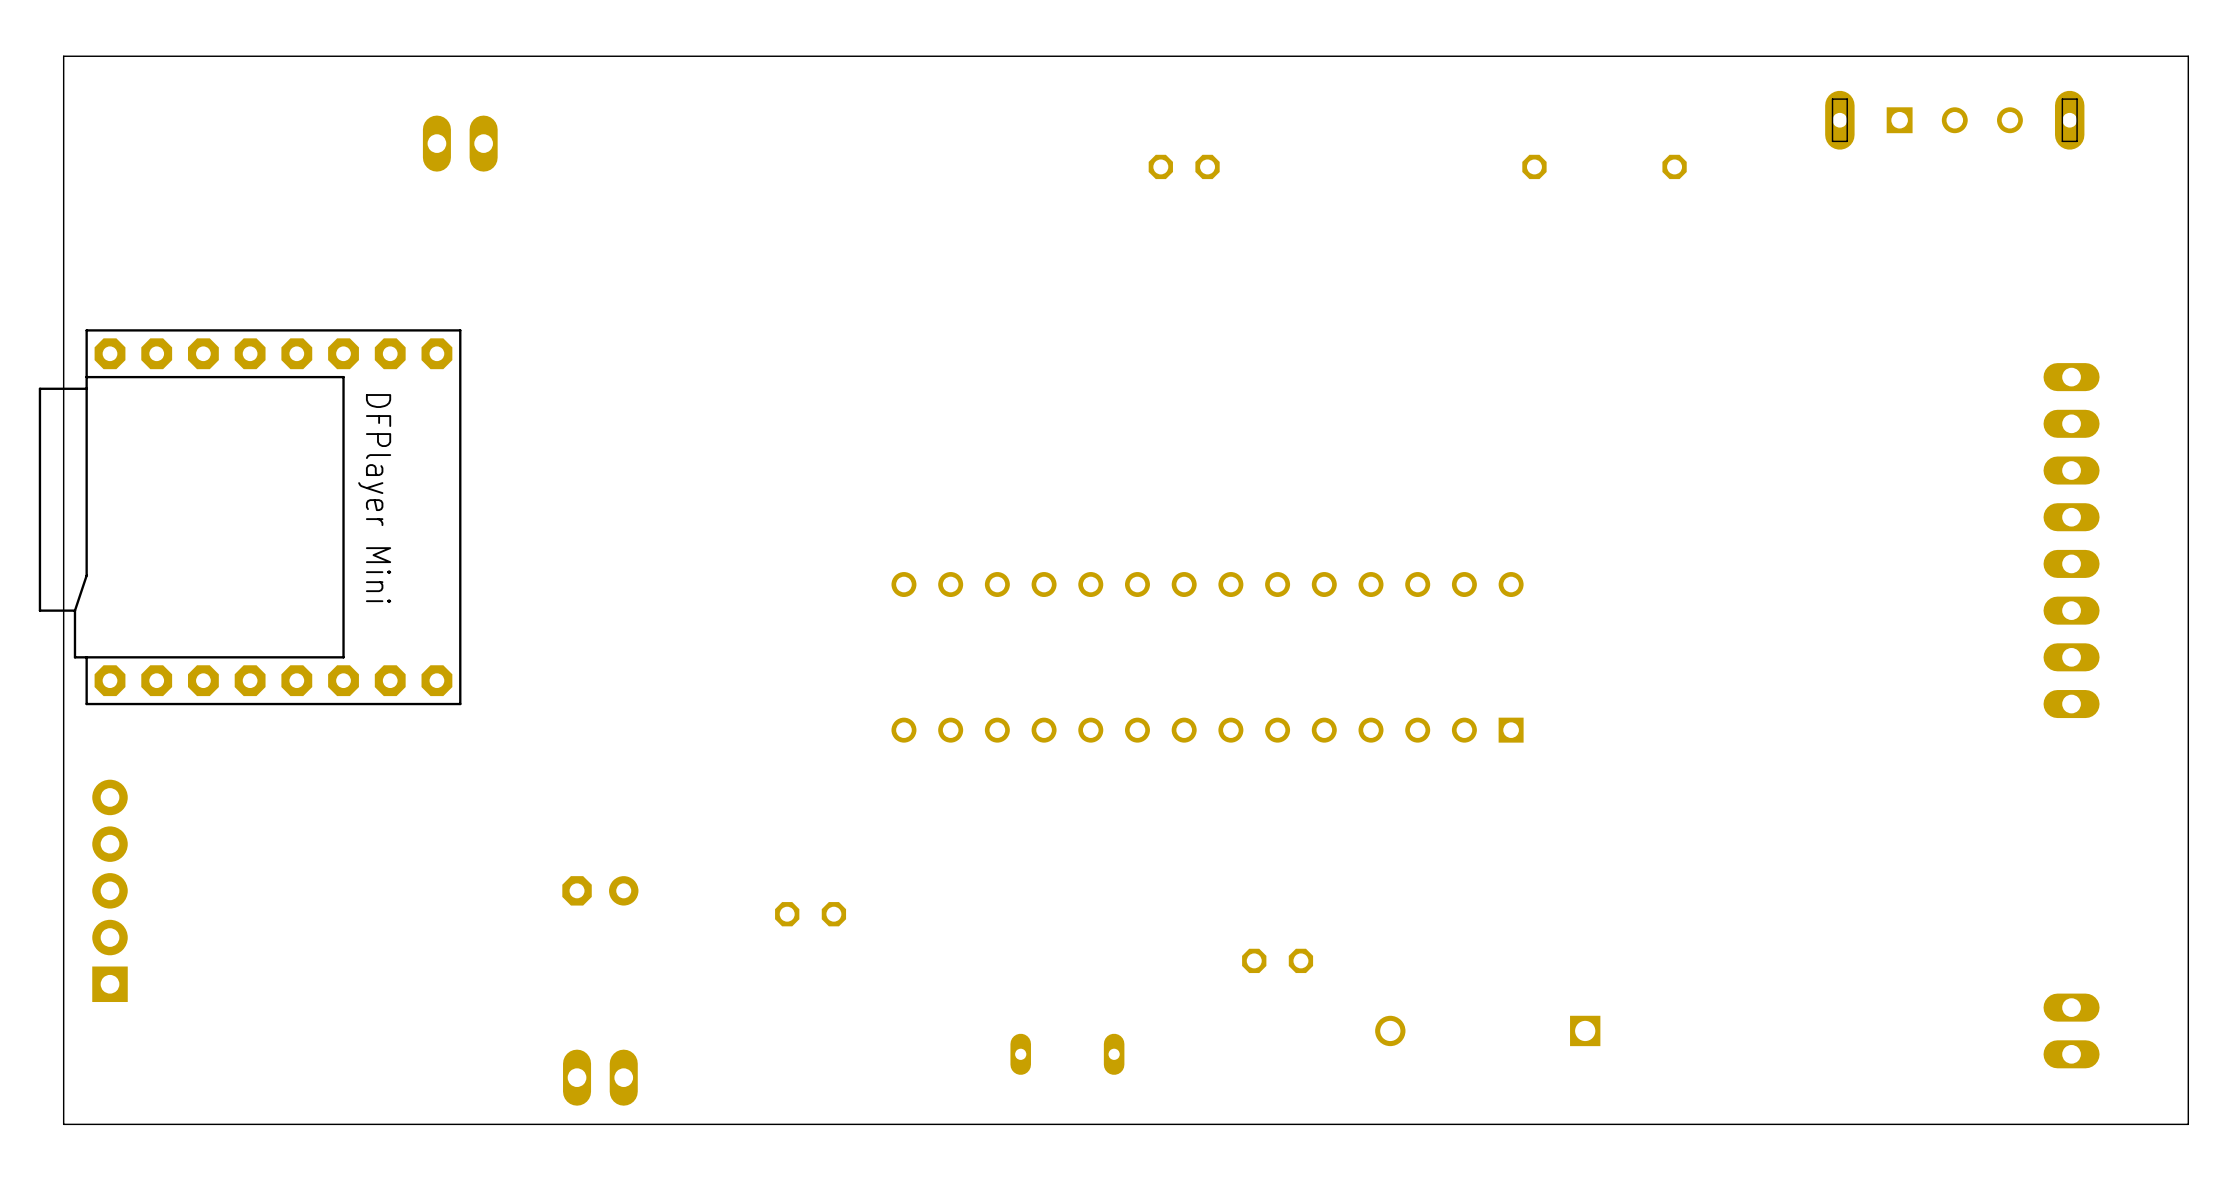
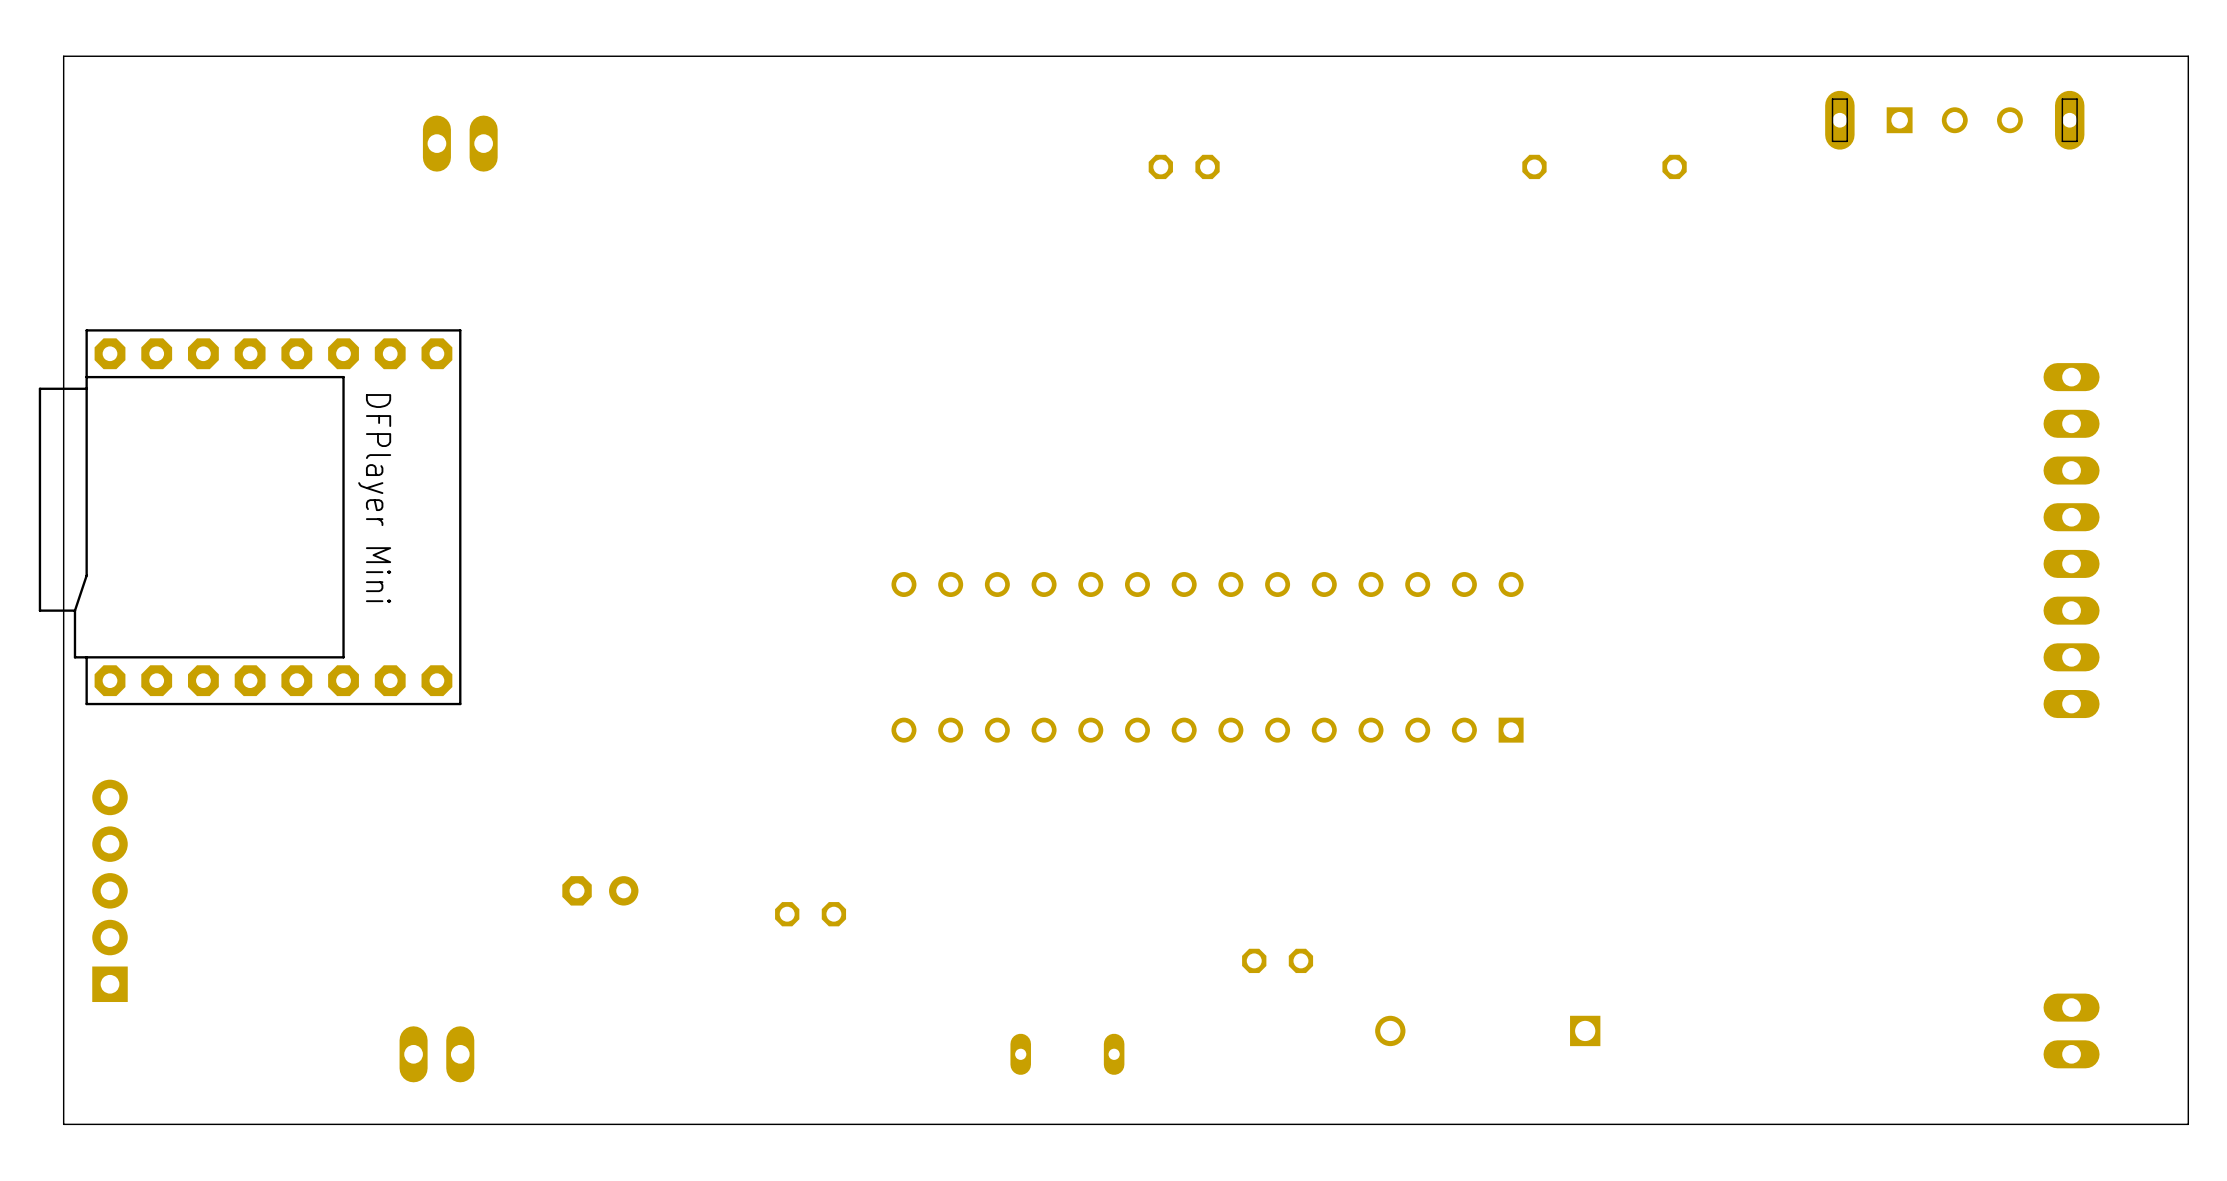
part position: (600, 1077) -> (436, 1054)

